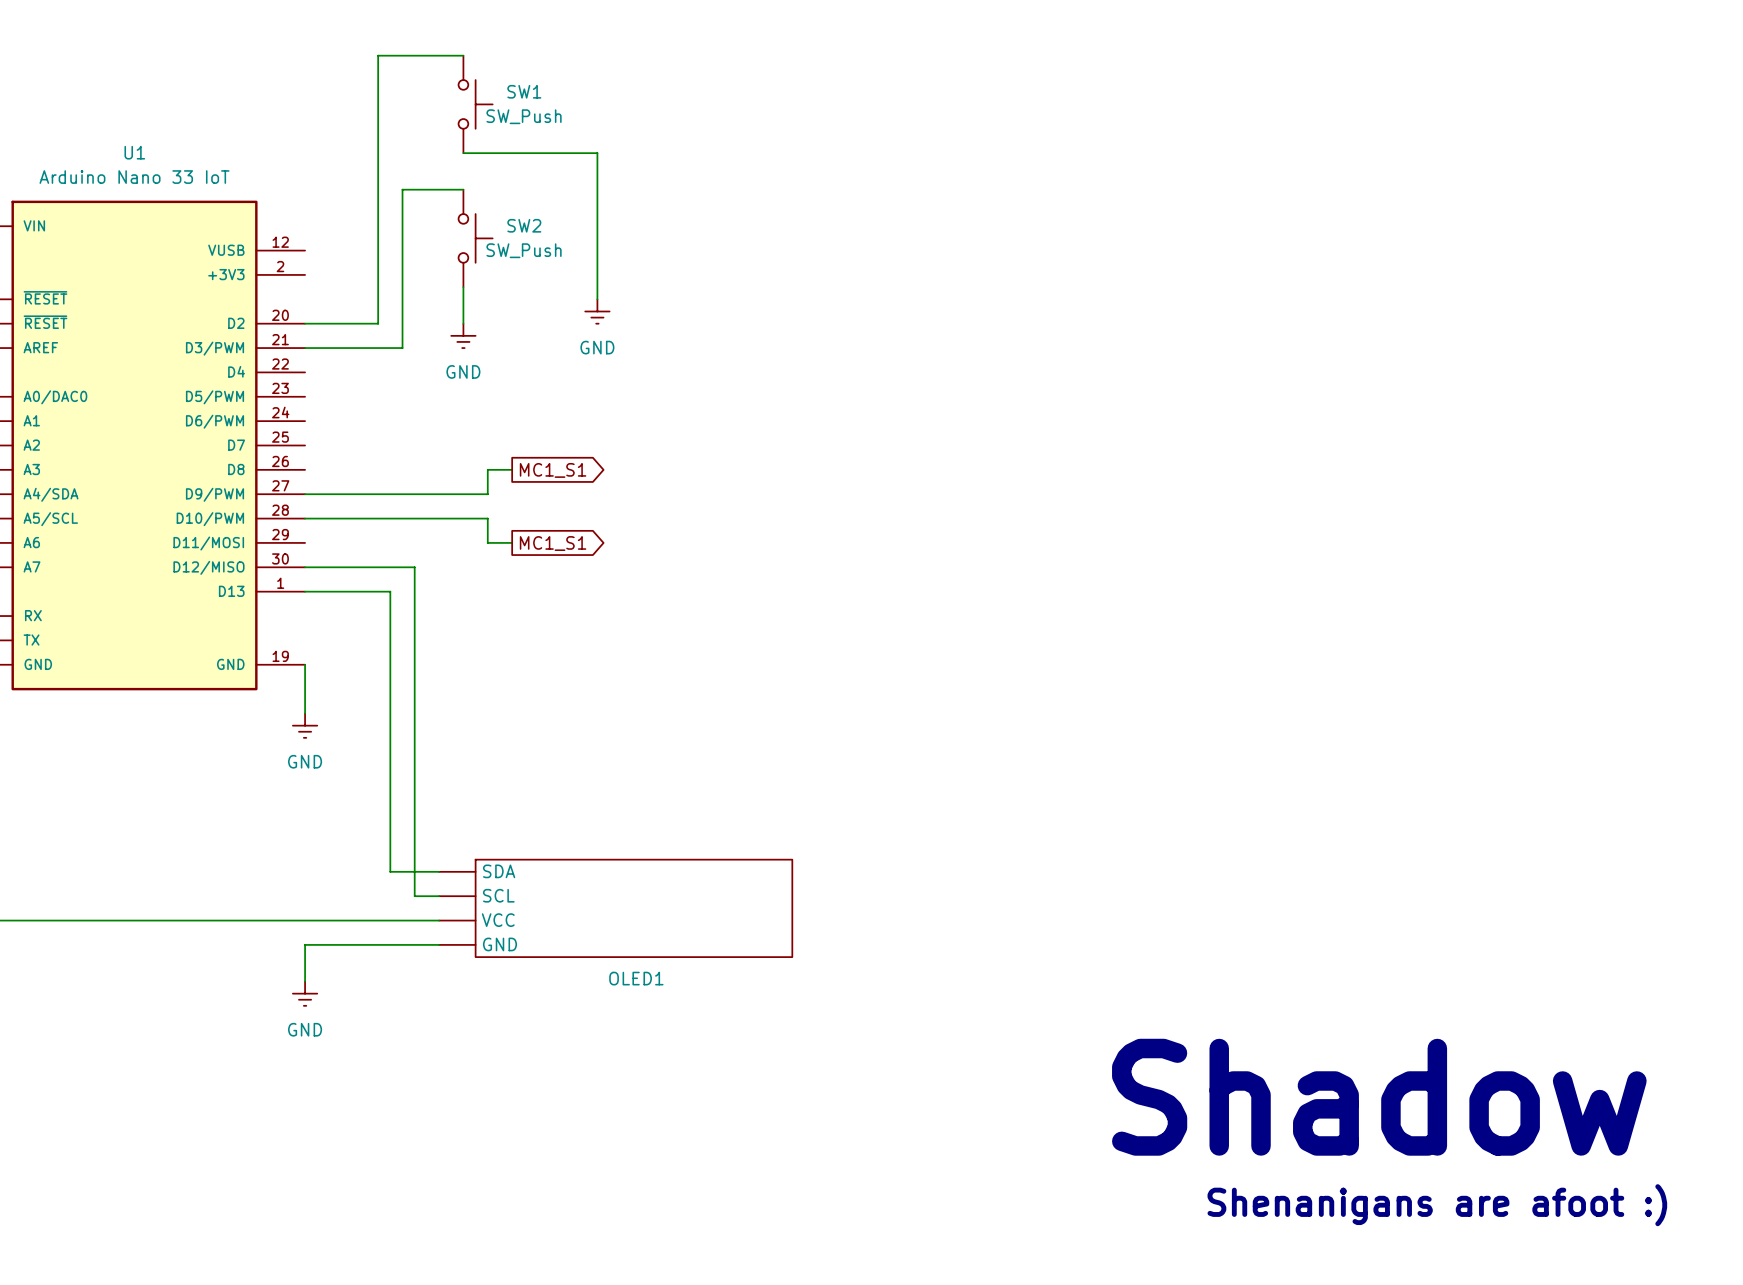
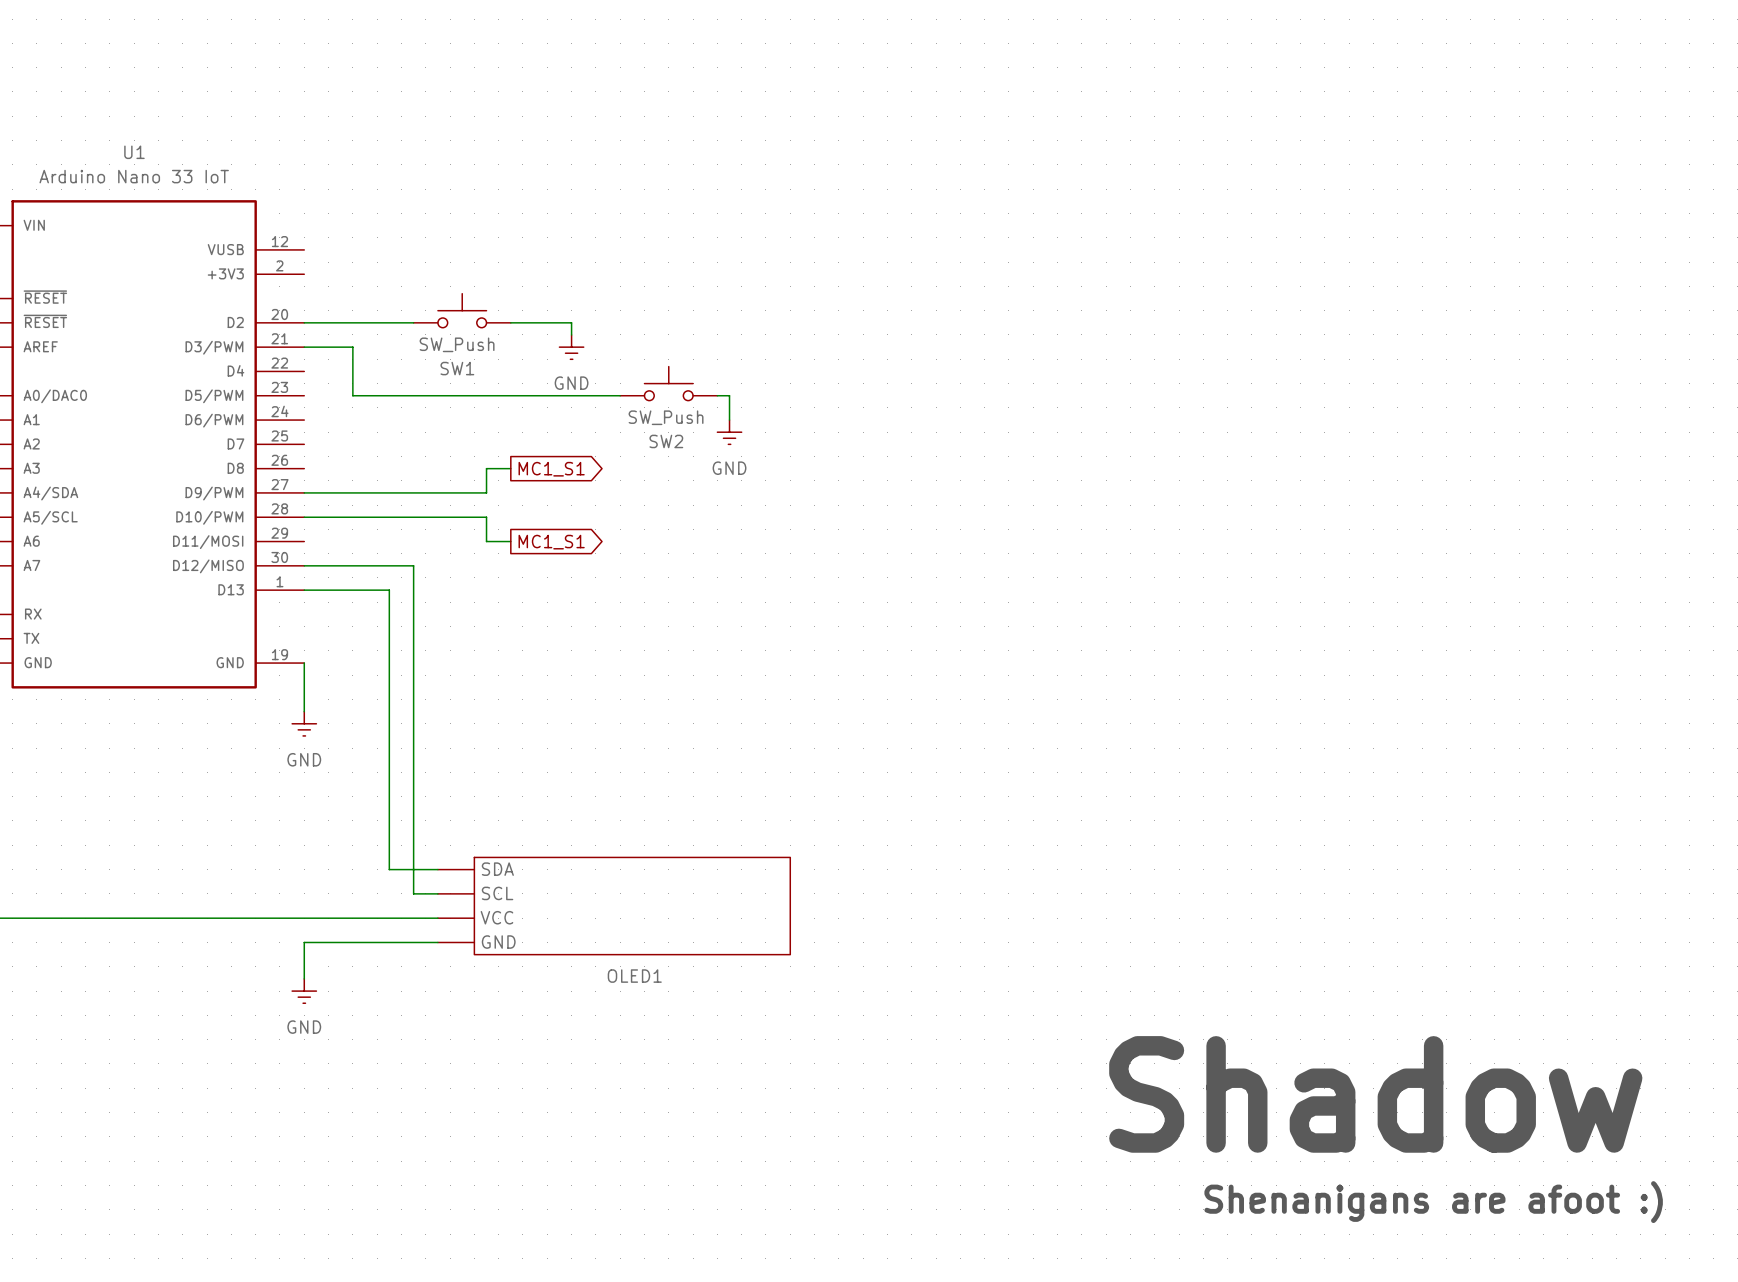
wire: (463, 55) (378, 55) (378, 323) -> (413, 322) (377, 322)
SW1 name position: SW1 (524, 91) -> SW1 (457, 368)
SW1 rotation: 0° (475, 104) -> 90° counterclockwise (462, 310)
SW1 position: (475, 104) -> (462, 310)
SW1 value position: SW_Push (524, 116) -> SW_Push (457, 344)
wire: (463, 153) (597, 153) (597, 299) -> none
wire: (463, 189) (402, 189) (402, 348) (353, 348) -> (620, 395) (352, 395) (352, 347)
SW2 name position: SW2 (524, 225) -> SW2 (666, 441)
SW2 rotation: 0° (475, 238) -> 90° counterclockwise (668, 383)
SW2 position: (475, 238) -> (668, 383)
SW2 value position: SW_Push (524, 250) -> SW_Push (666, 417)
wire: (463, 287) (463, 323) -> none
power symbol position: GND (597, 311) -> GND (571, 347)
wire: none -> (510, 322) (571, 322) (571, 334)
power symbol: GND (463, 335) -> none
wire: none -> (717, 395) (729, 395) (729, 420)
power symbol: none -> GND (729, 432)

